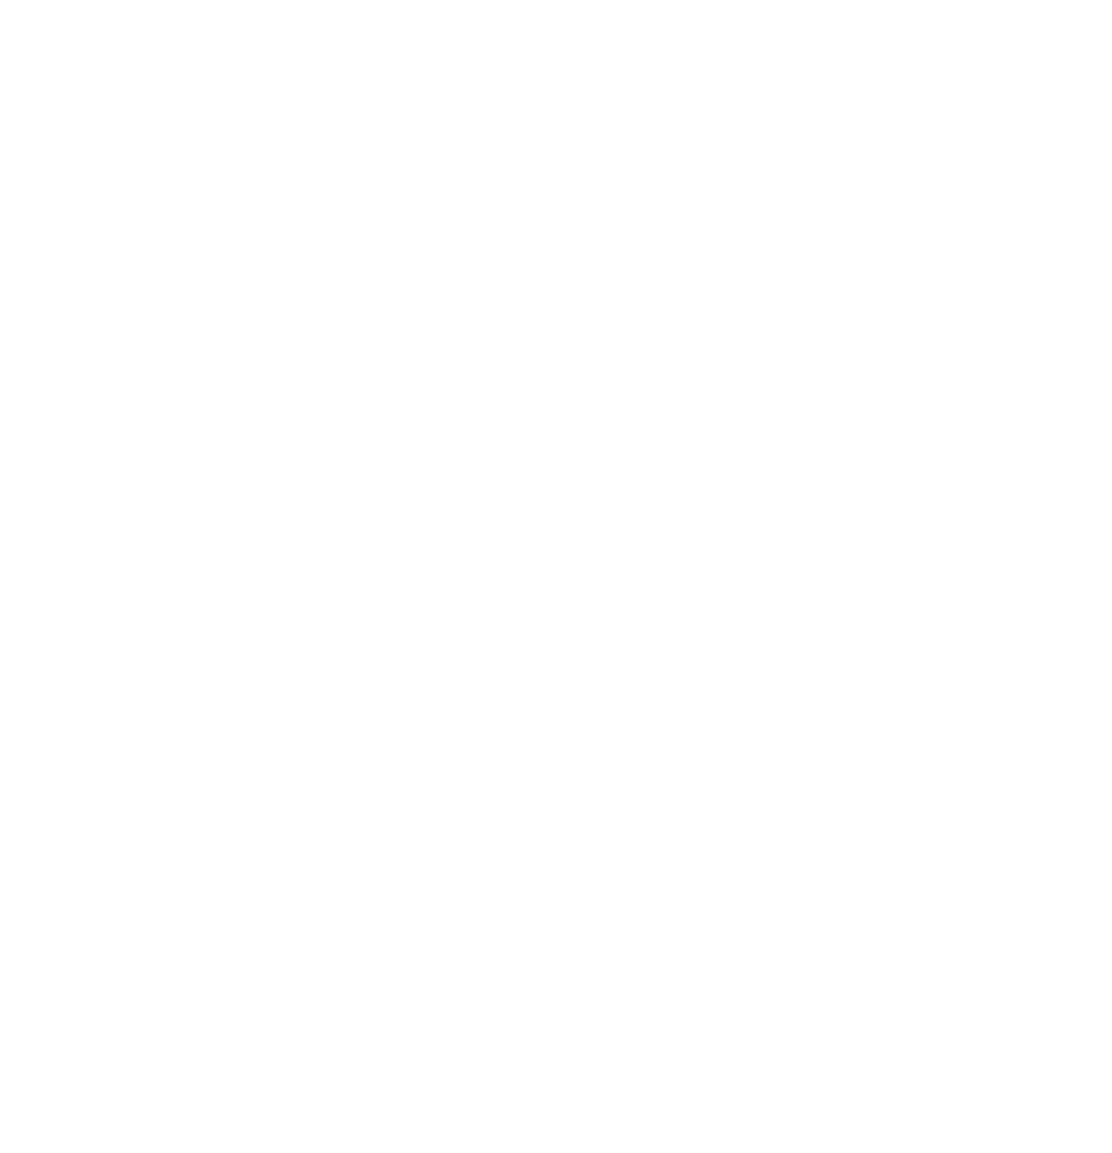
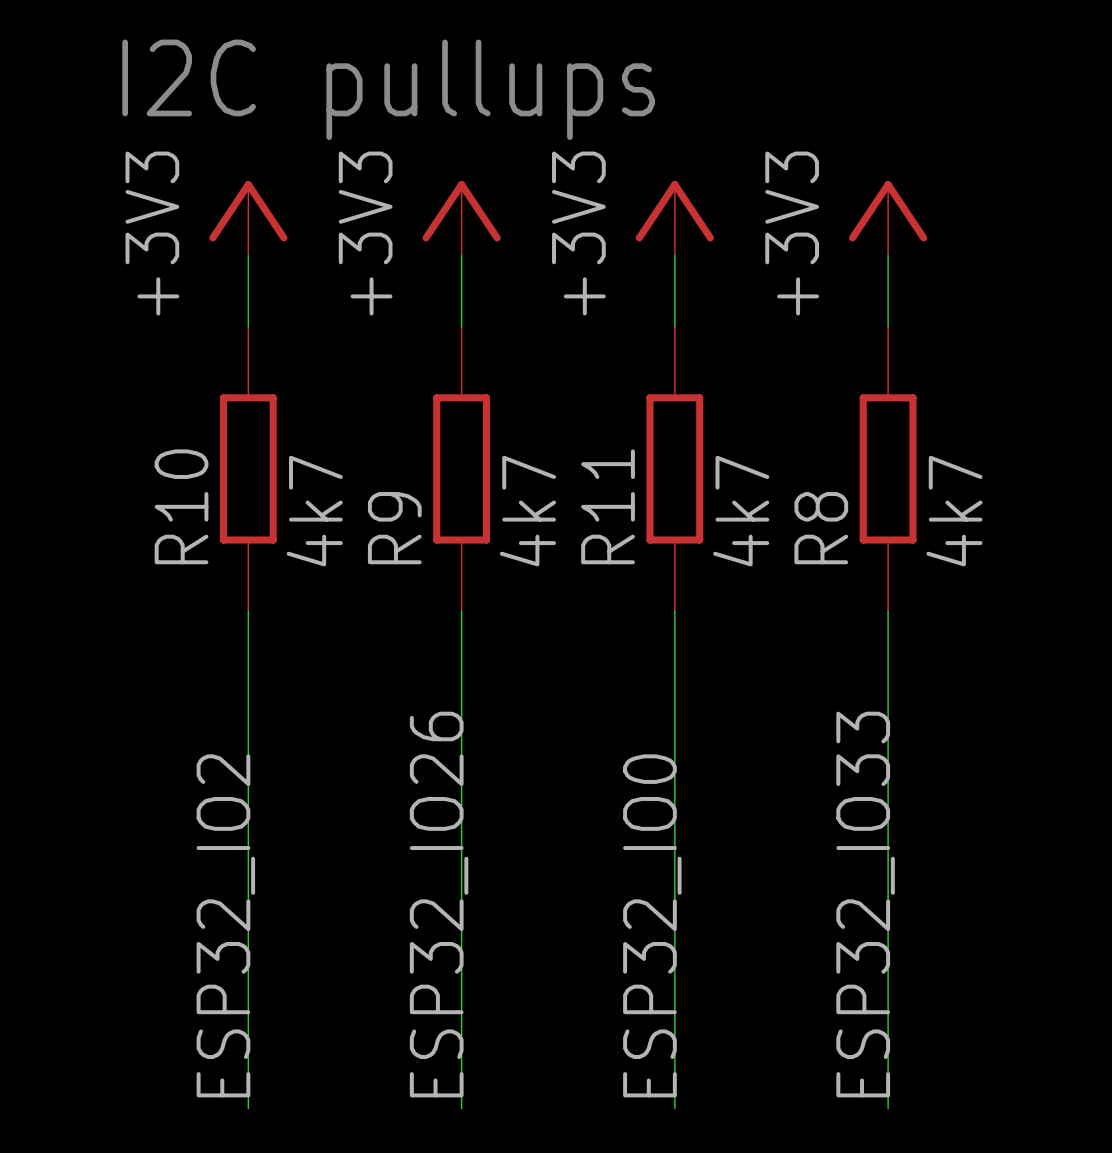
text: none -> I2C pullups (388, 89)
power symbol: none -> +3V3 (248, 218)
power symbol: none -> +3V3 (461, 218)
power symbol: none -> +3V3 (674, 218)
power symbol: none -> +3V3 (888, 218)
wire: none -> (248, 255) (248, 326)
wire: none -> (461, 255) (461, 326)
wire: none -> (674, 255) (674, 326)
wire: none -> (888, 255) (888, 326)
R10: none -> 4k7 (248, 468)
R9: none -> 4k7 (461, 468)
R11: none -> 4k7 (674, 468)
R8: none -> 4k7 (888, 468)
wire: none -> (248, 611) (248, 1108)
wire: none -> (461, 611) (461, 1108)
wire: none -> (674, 611) (674, 1108)
wire: none -> (888, 611) (888, 1108)
label: none -> ESP32_IO26 (439, 904)
label: none -> ESP32_IO33 (865, 904)
label: none -> ESP32_IO2 (225, 925)
label: none -> ESP32_IO0 (652, 925)

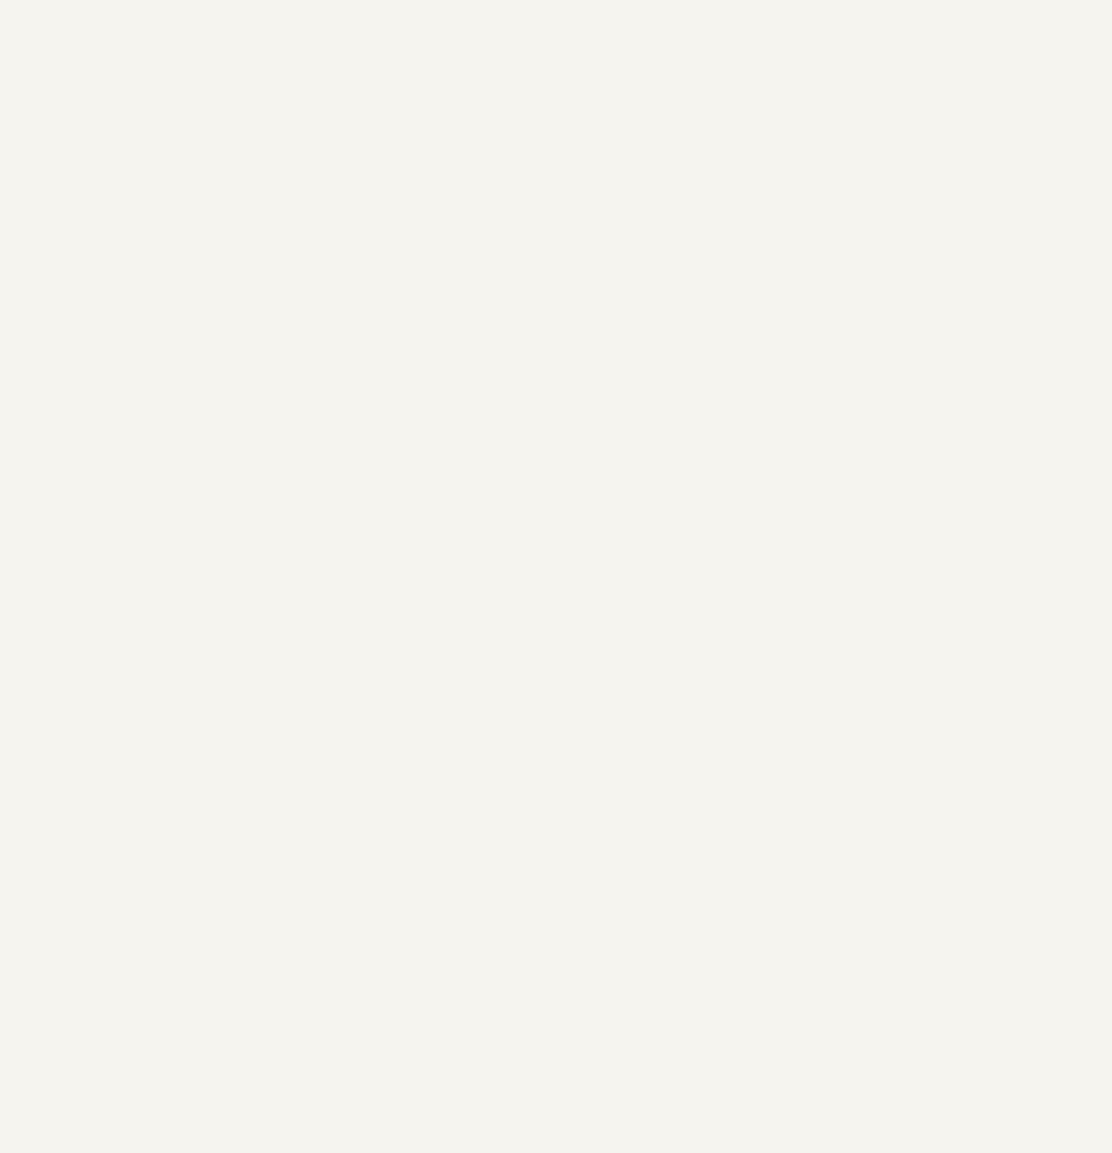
text: I2C pullups (388, 89) -> none
power symbol: +3V3 (248, 218) -> none
power symbol: +3V3 (461, 218) -> none
power symbol: +3V3 (674, 218) -> none
power symbol: +3V3 (888, 218) -> none
wire: (248, 255) (248, 326) -> none
wire: (461, 255) (461, 326) -> none
wire: (674, 255) (674, 326) -> none
wire: (888, 255) (888, 326) -> none
R10: 4k7 (248, 468) -> none
R9: 4k7 (461, 468) -> none
R11: 4k7 (674, 468) -> none
R8: 4k7 (888, 468) -> none
wire: (248, 611) (248, 1108) -> none
wire: (461, 611) (461, 1108) -> none
wire: (674, 611) (674, 1108) -> none
wire: (888, 611) (888, 1108) -> none
label: ESP32_IO26 (439, 904) -> none
label: ESP32_IO33 (865, 904) -> none
label: ESP32_IO2 (225, 925) -> none
label: ESP32_IO0 (652, 925) -> none

